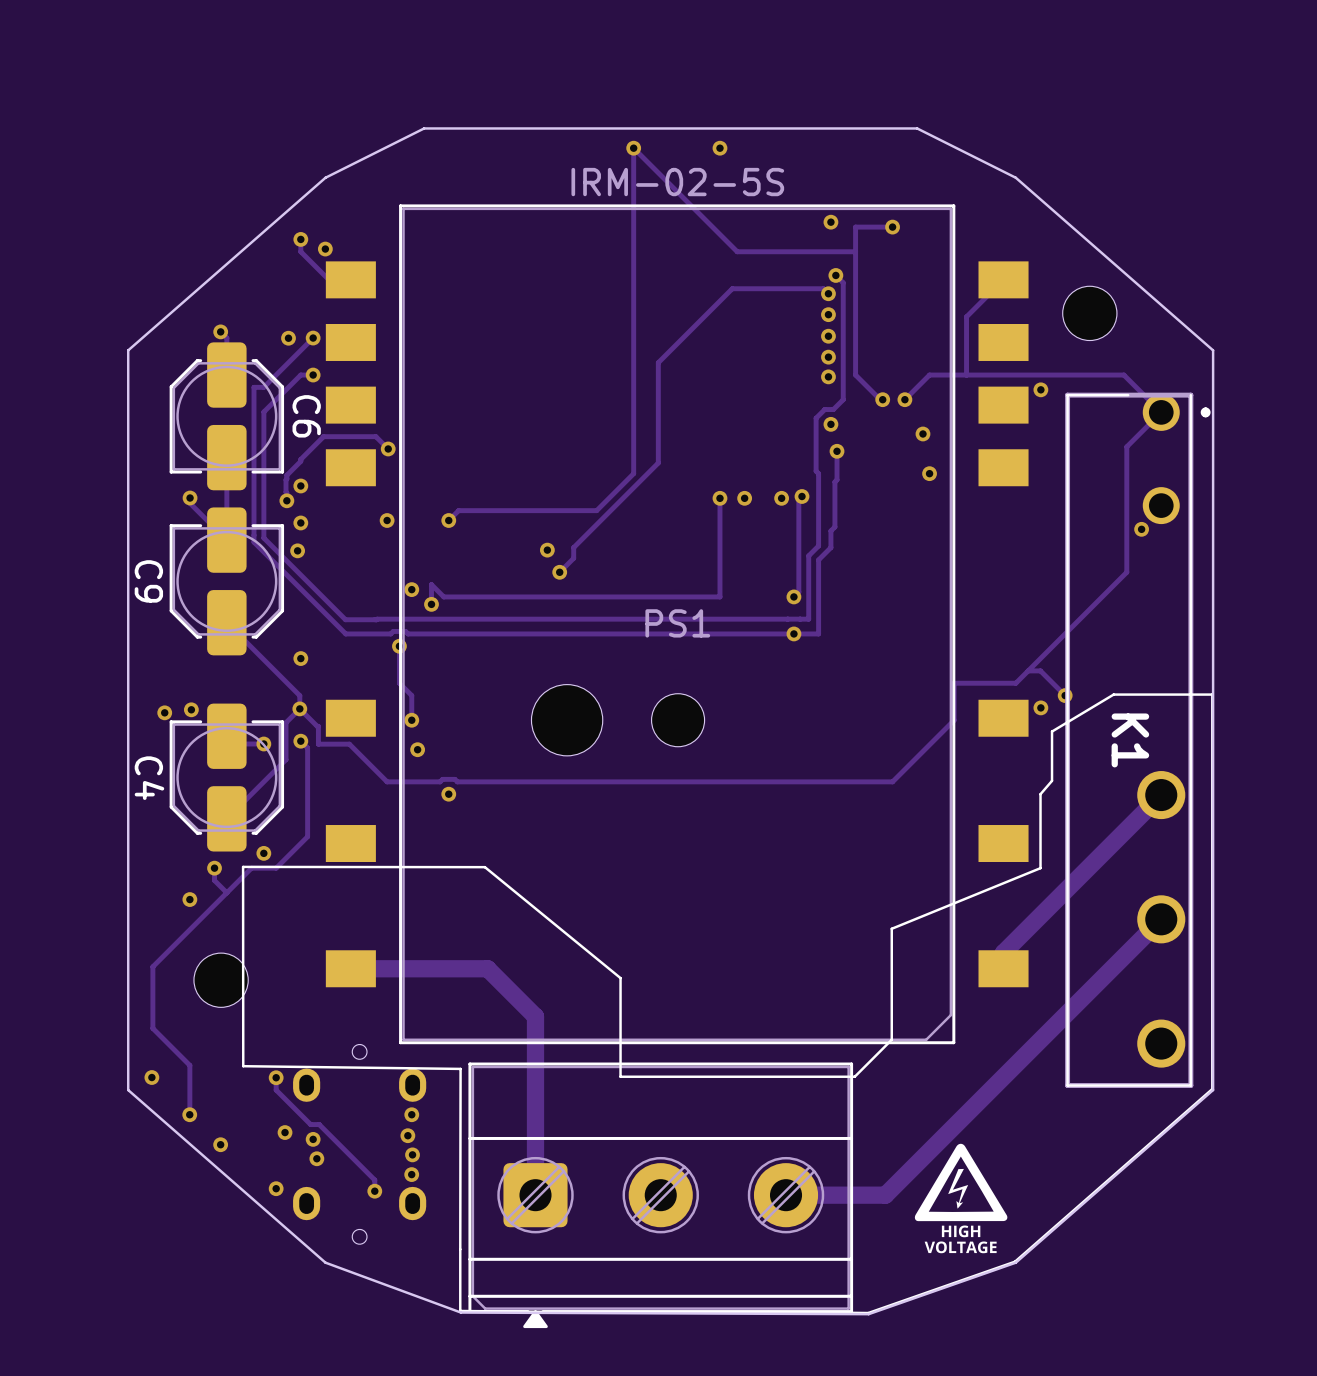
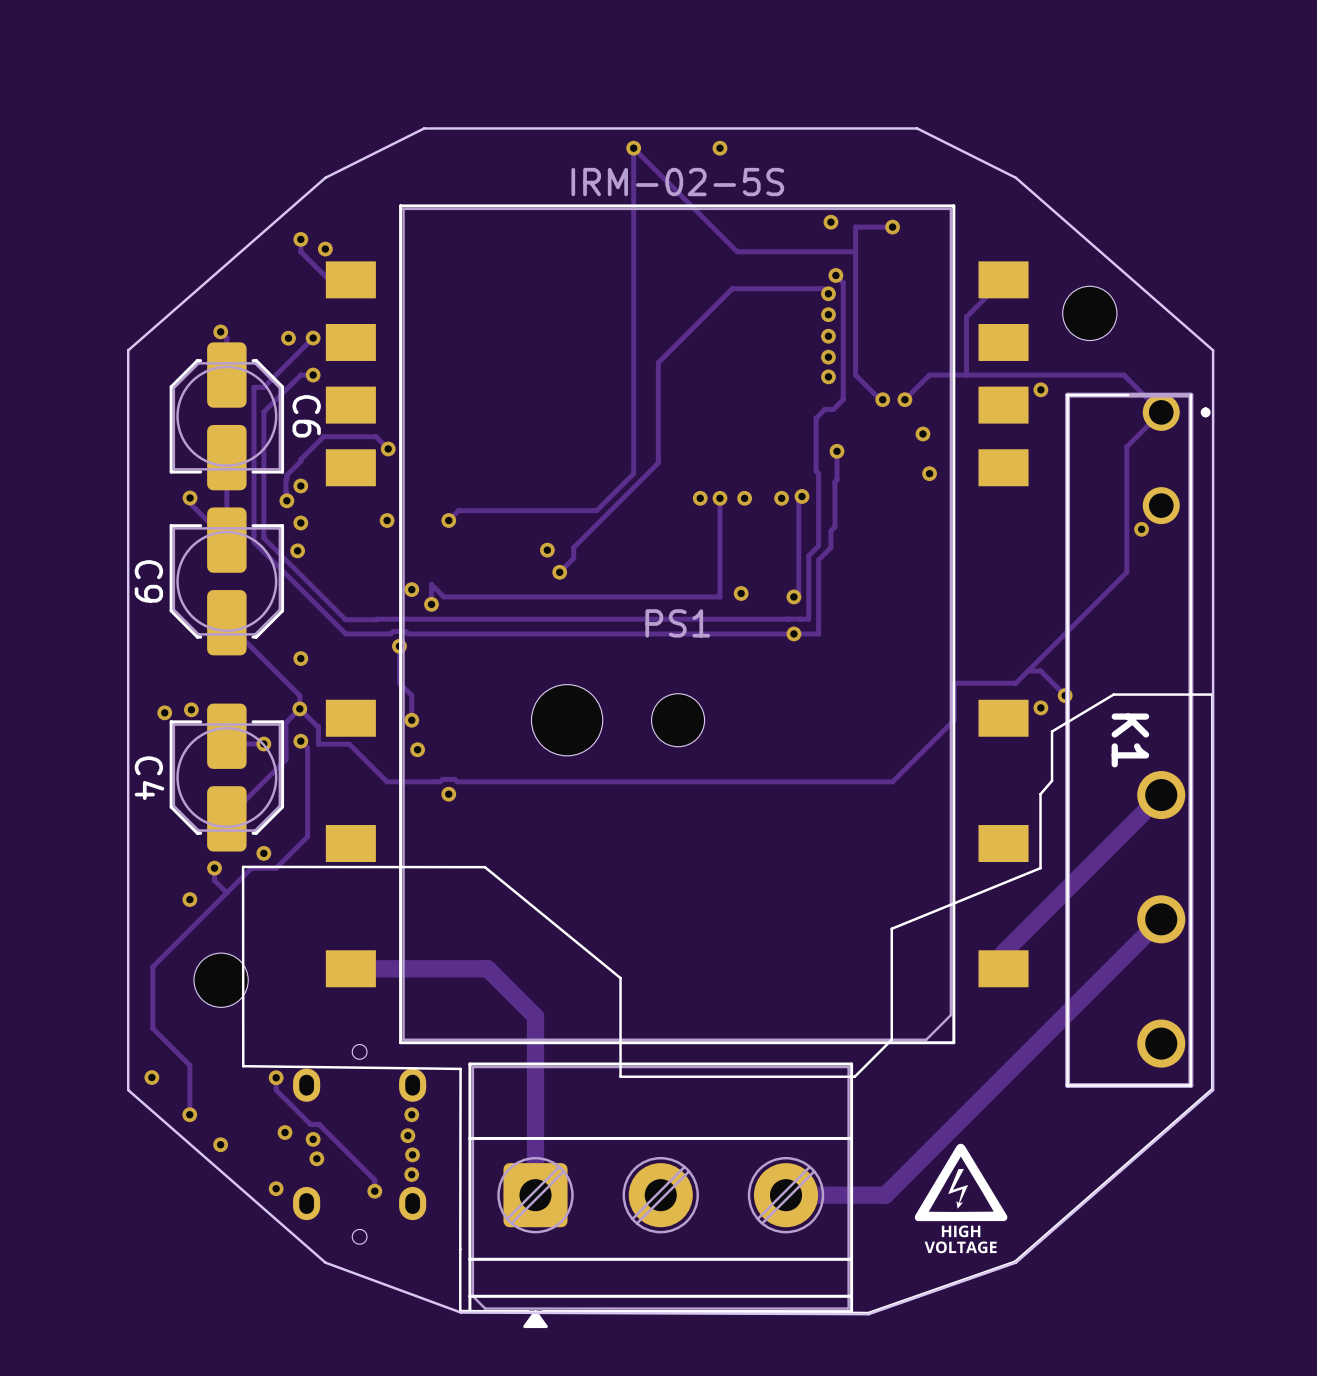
via: (830, 424) -> none
via: none -> (700, 498)
via: none -> (741, 593)

